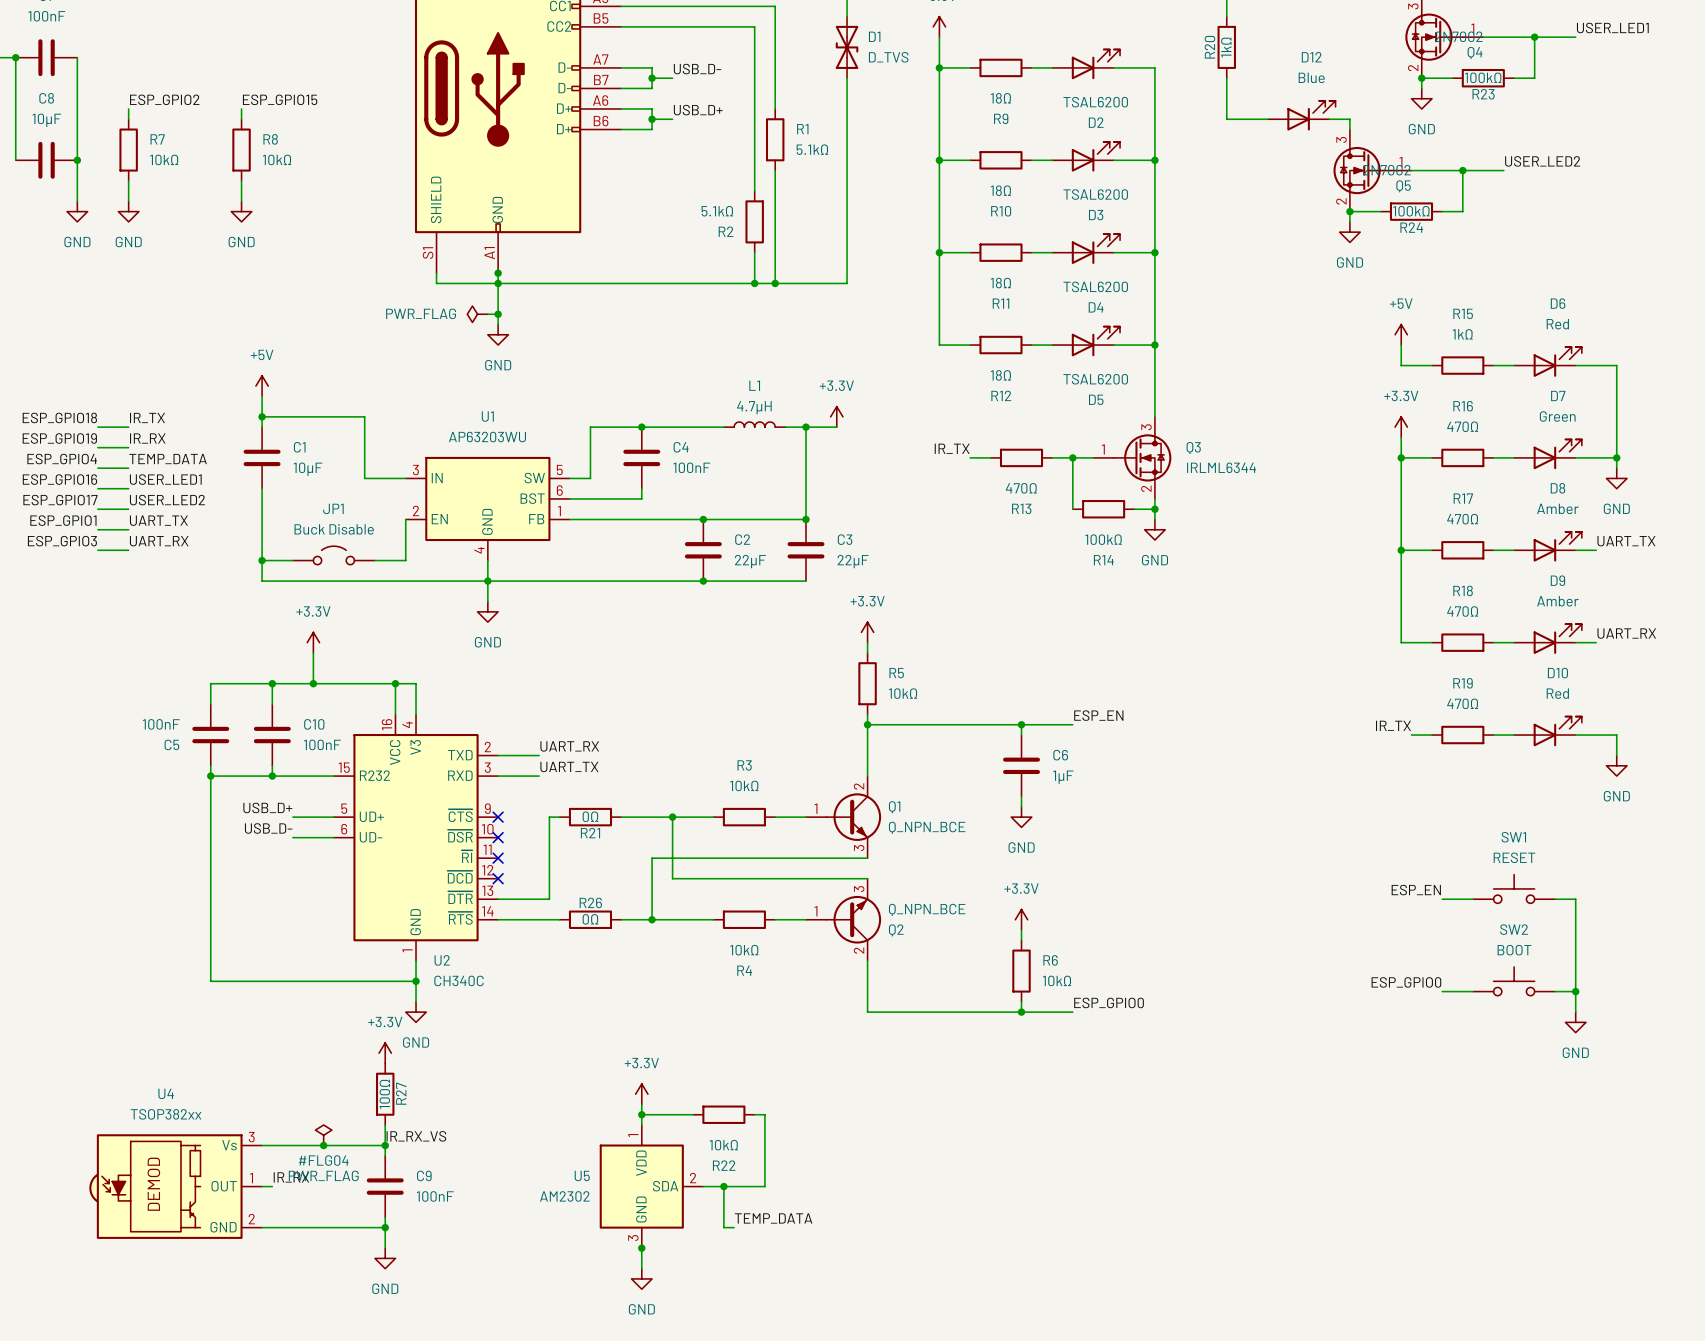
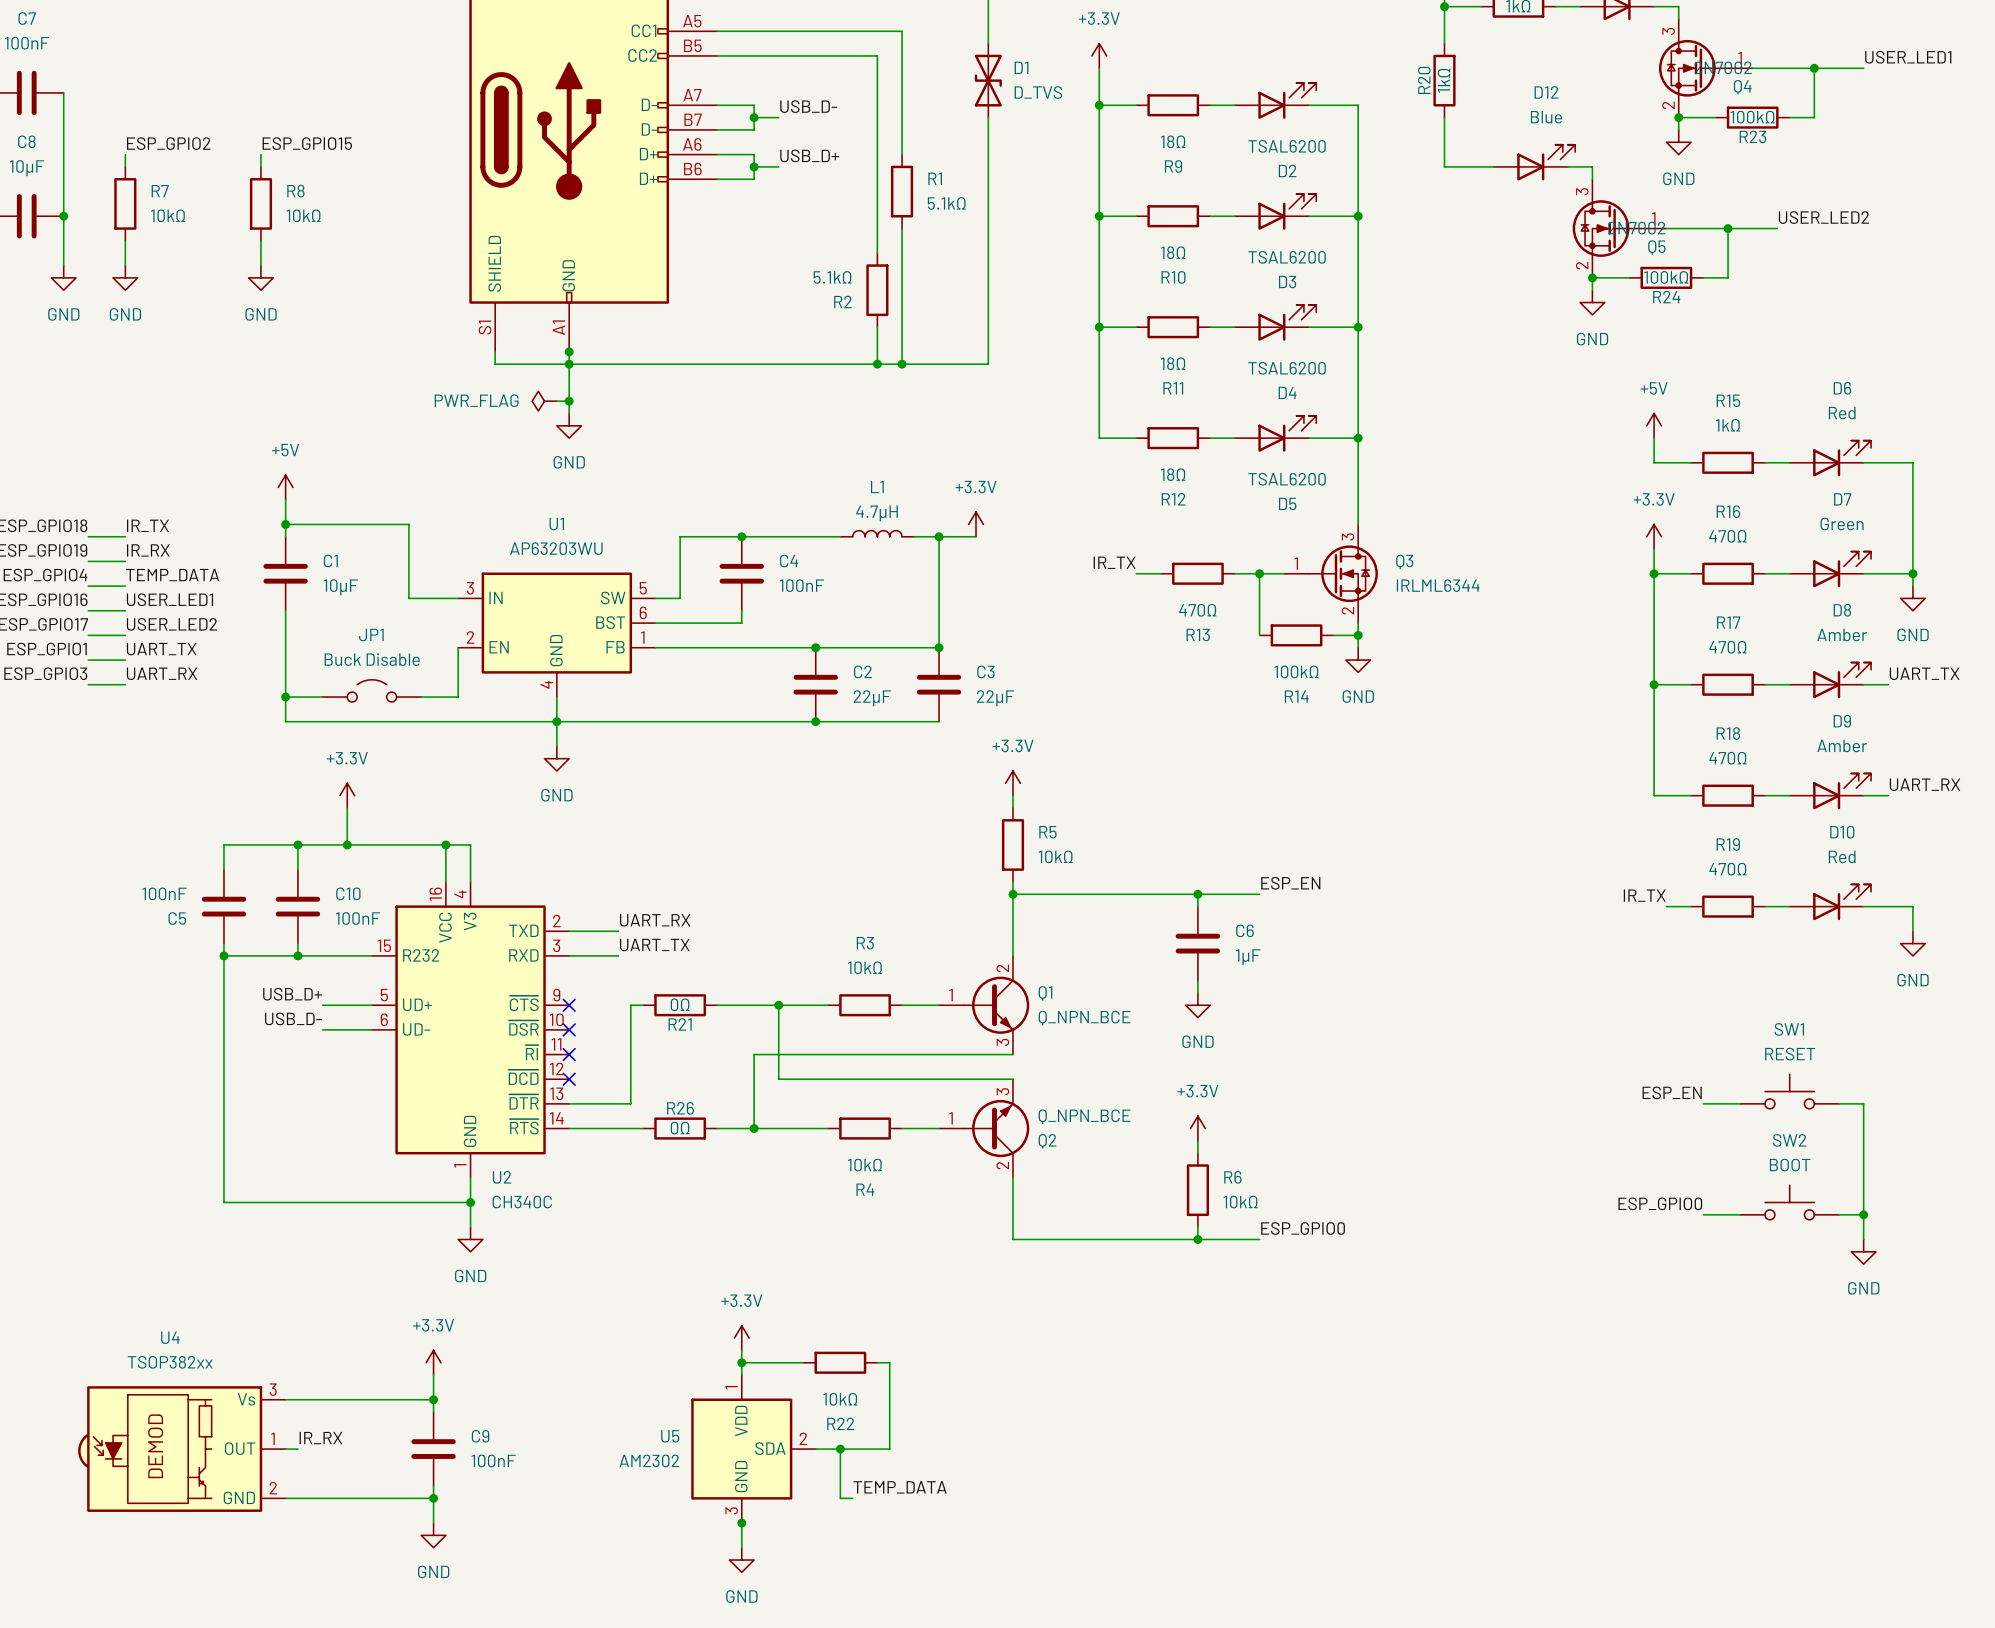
power symbol position: +3.3V (385, 1053) -> +3.3V (433, 1362)
R27: 100Ω (385, 1094) -> none
#FLG04: PWR_FLAG (323, 1135) -> none
label: IR_RX_VS (416, 1136) -> none
junction: (323, 1145) -> none

